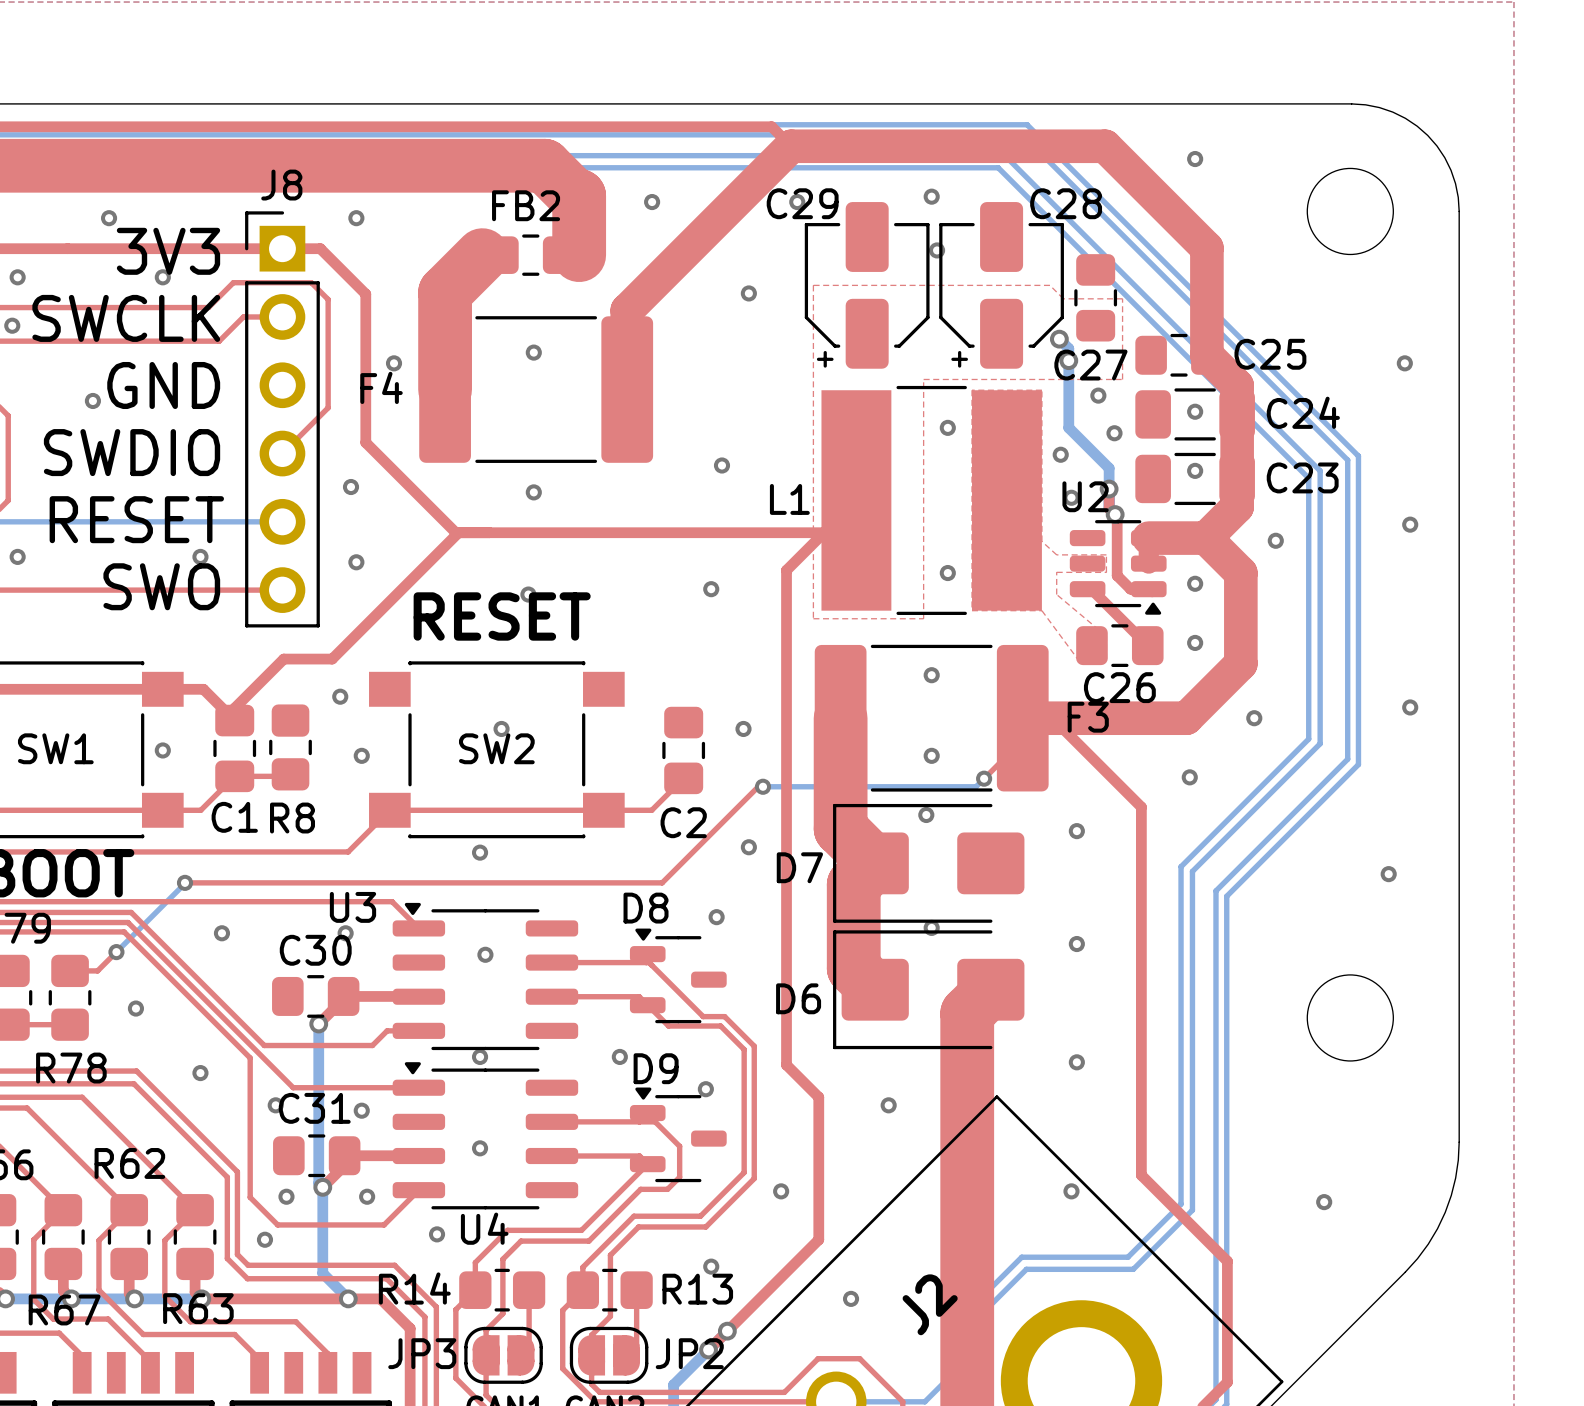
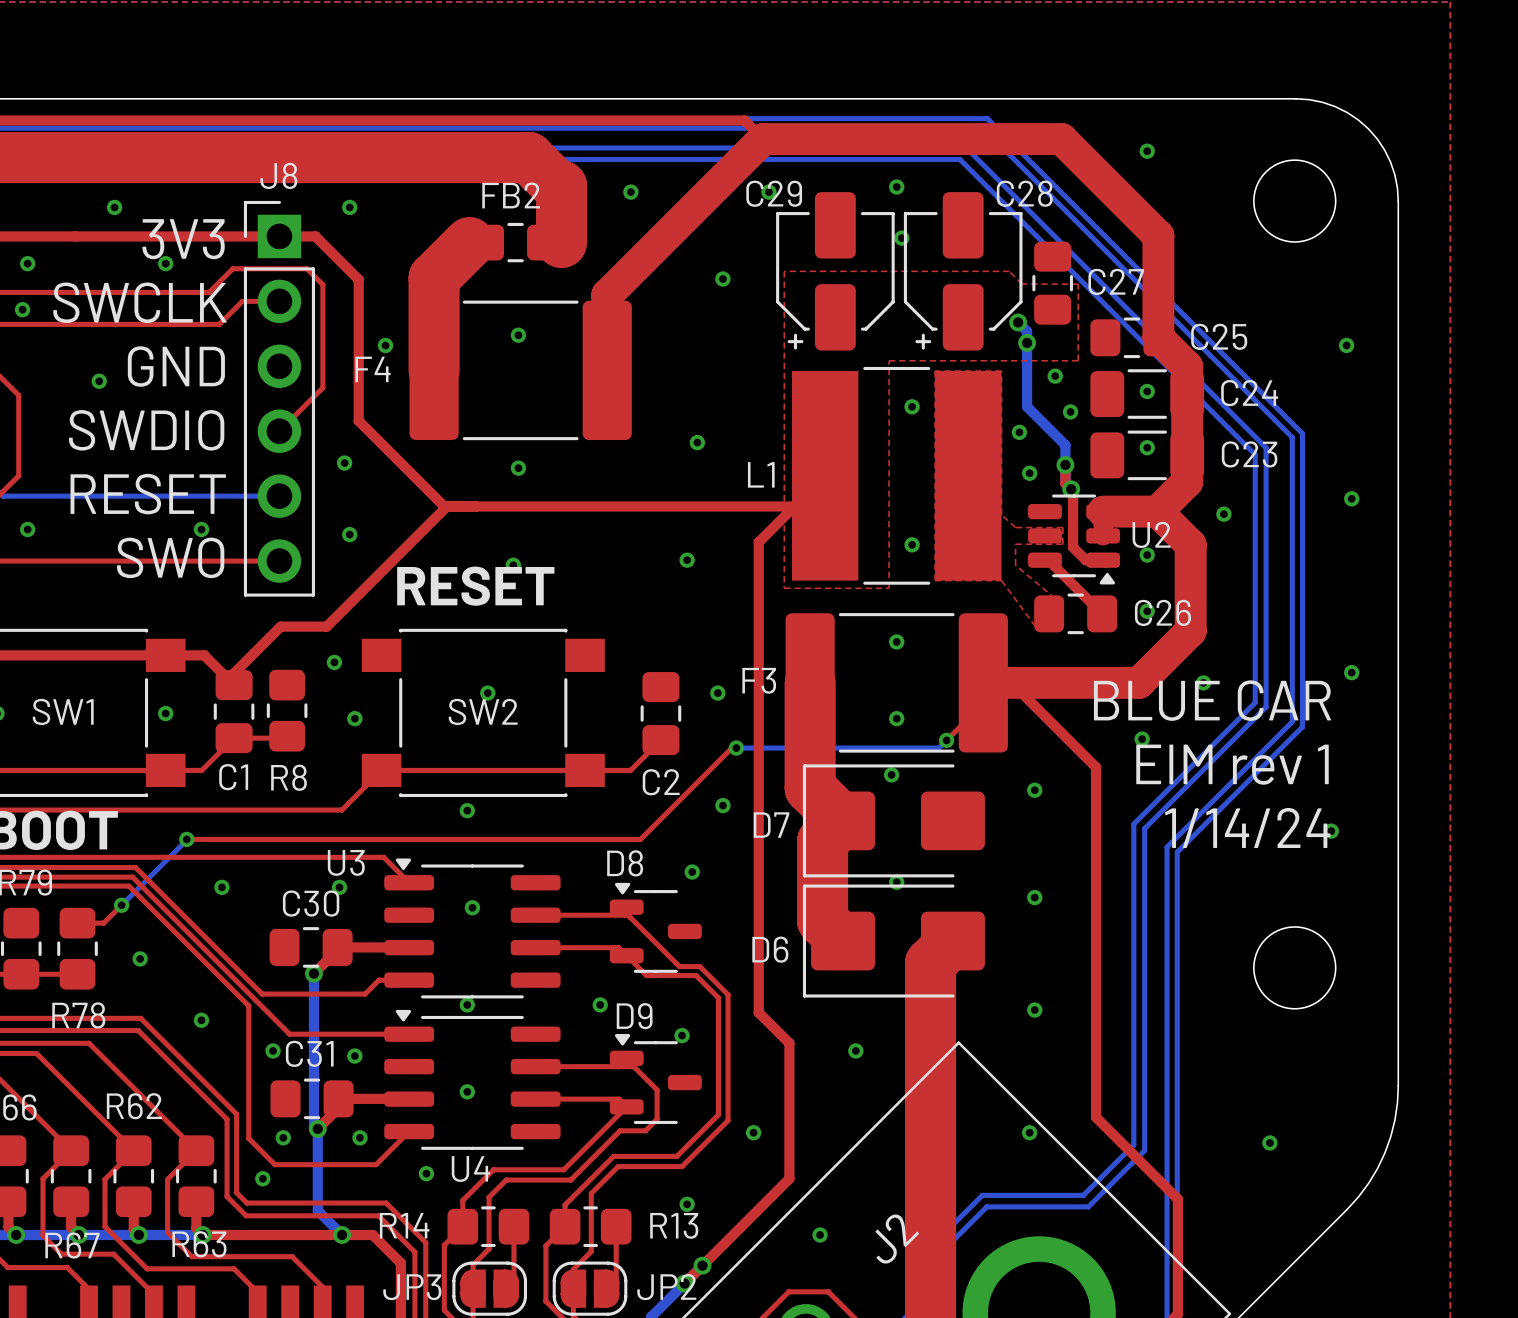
C27 name position: C27 (1090, 365) -> C27 (1116, 281)
U2 name position: U2 (1085, 496) -> U2 (1151, 534)
C26 name position: C26 (1119, 687) -> C26 (1162, 612)
F3 name position: F3 (1088, 717) -> F3 (759, 680)
text: none -> BLUE CAR (1212, 700)
text: none -> EIM rev 1 (1232, 764)
text: none -> 1/14/24 (1247, 827)

